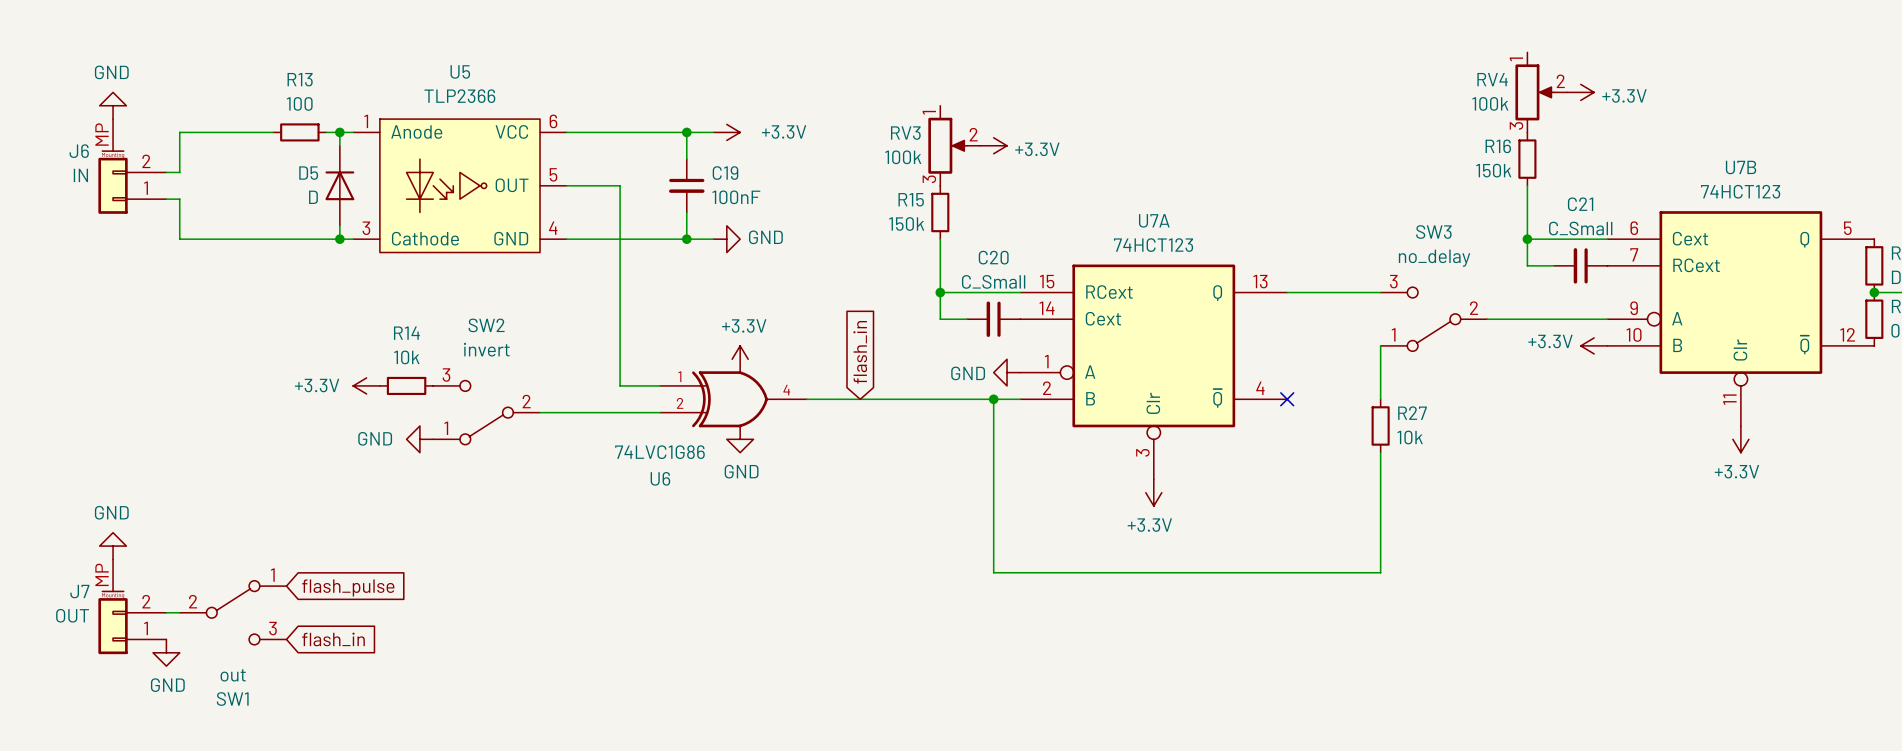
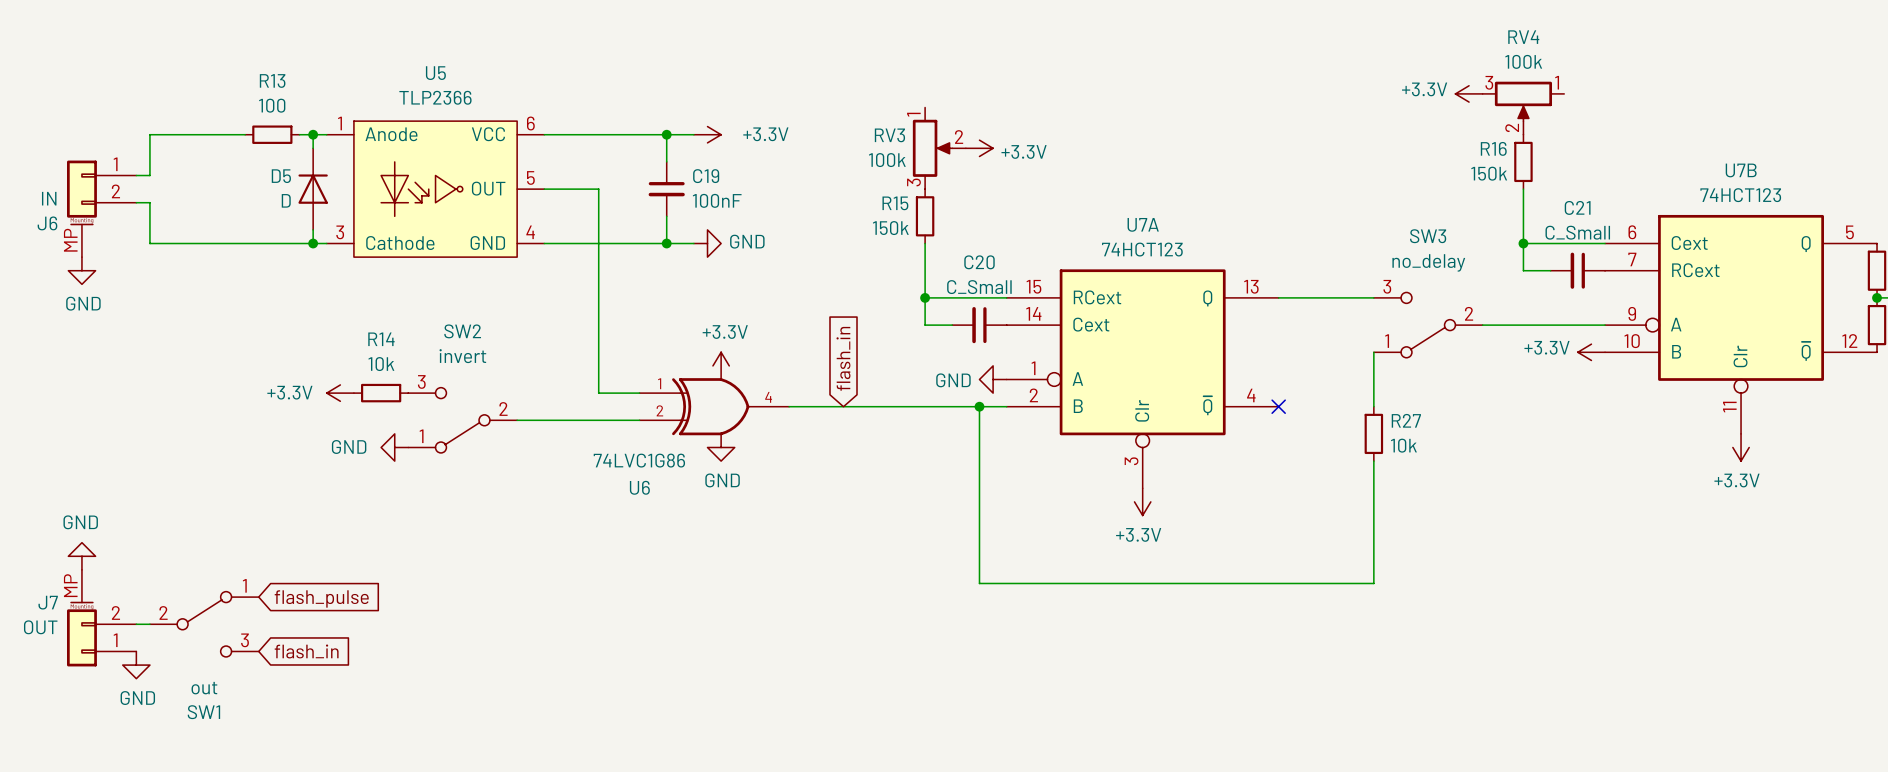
RV4 rotation: 0° (1534, 92) -> 90° clockwise (1523, 101)
power symbol rotation: 0° (1580, 92) -> 180° (1469, 93)
power symbol position: +3.3V (1580, 92) -> +3.3V (1469, 93)
power symbol rotation: 0° (113, 105) -> 180° (81, 270)
power symbol position: GND (113, 105) -> GND (81, 270)
J6 flip: as is (113, 182) -> up-down (81, 192)

